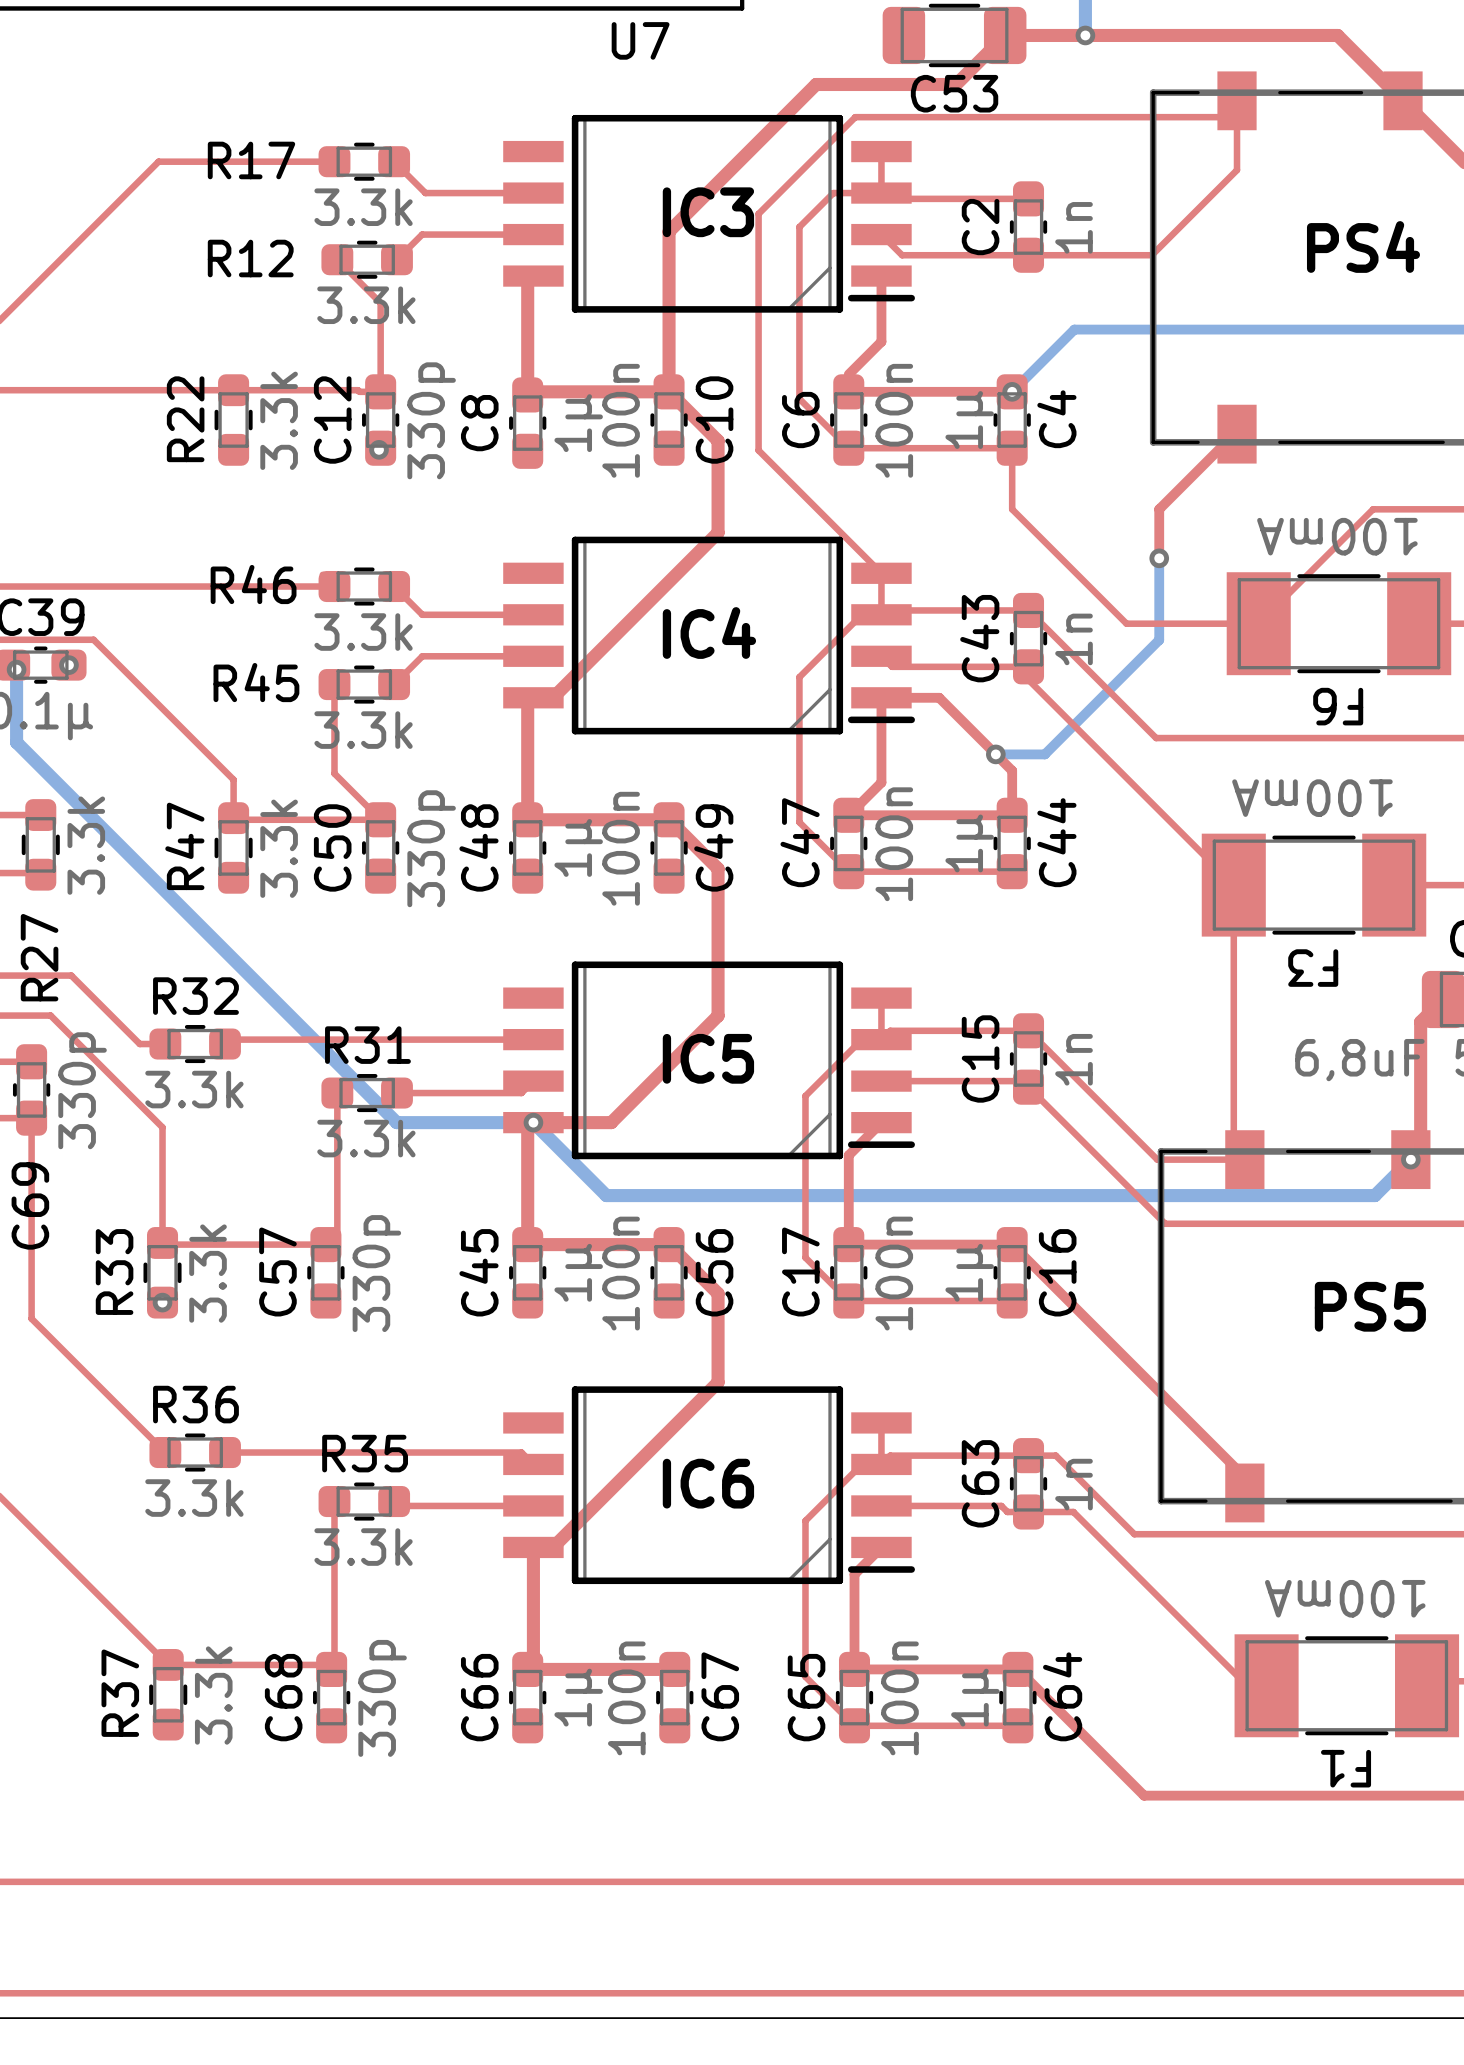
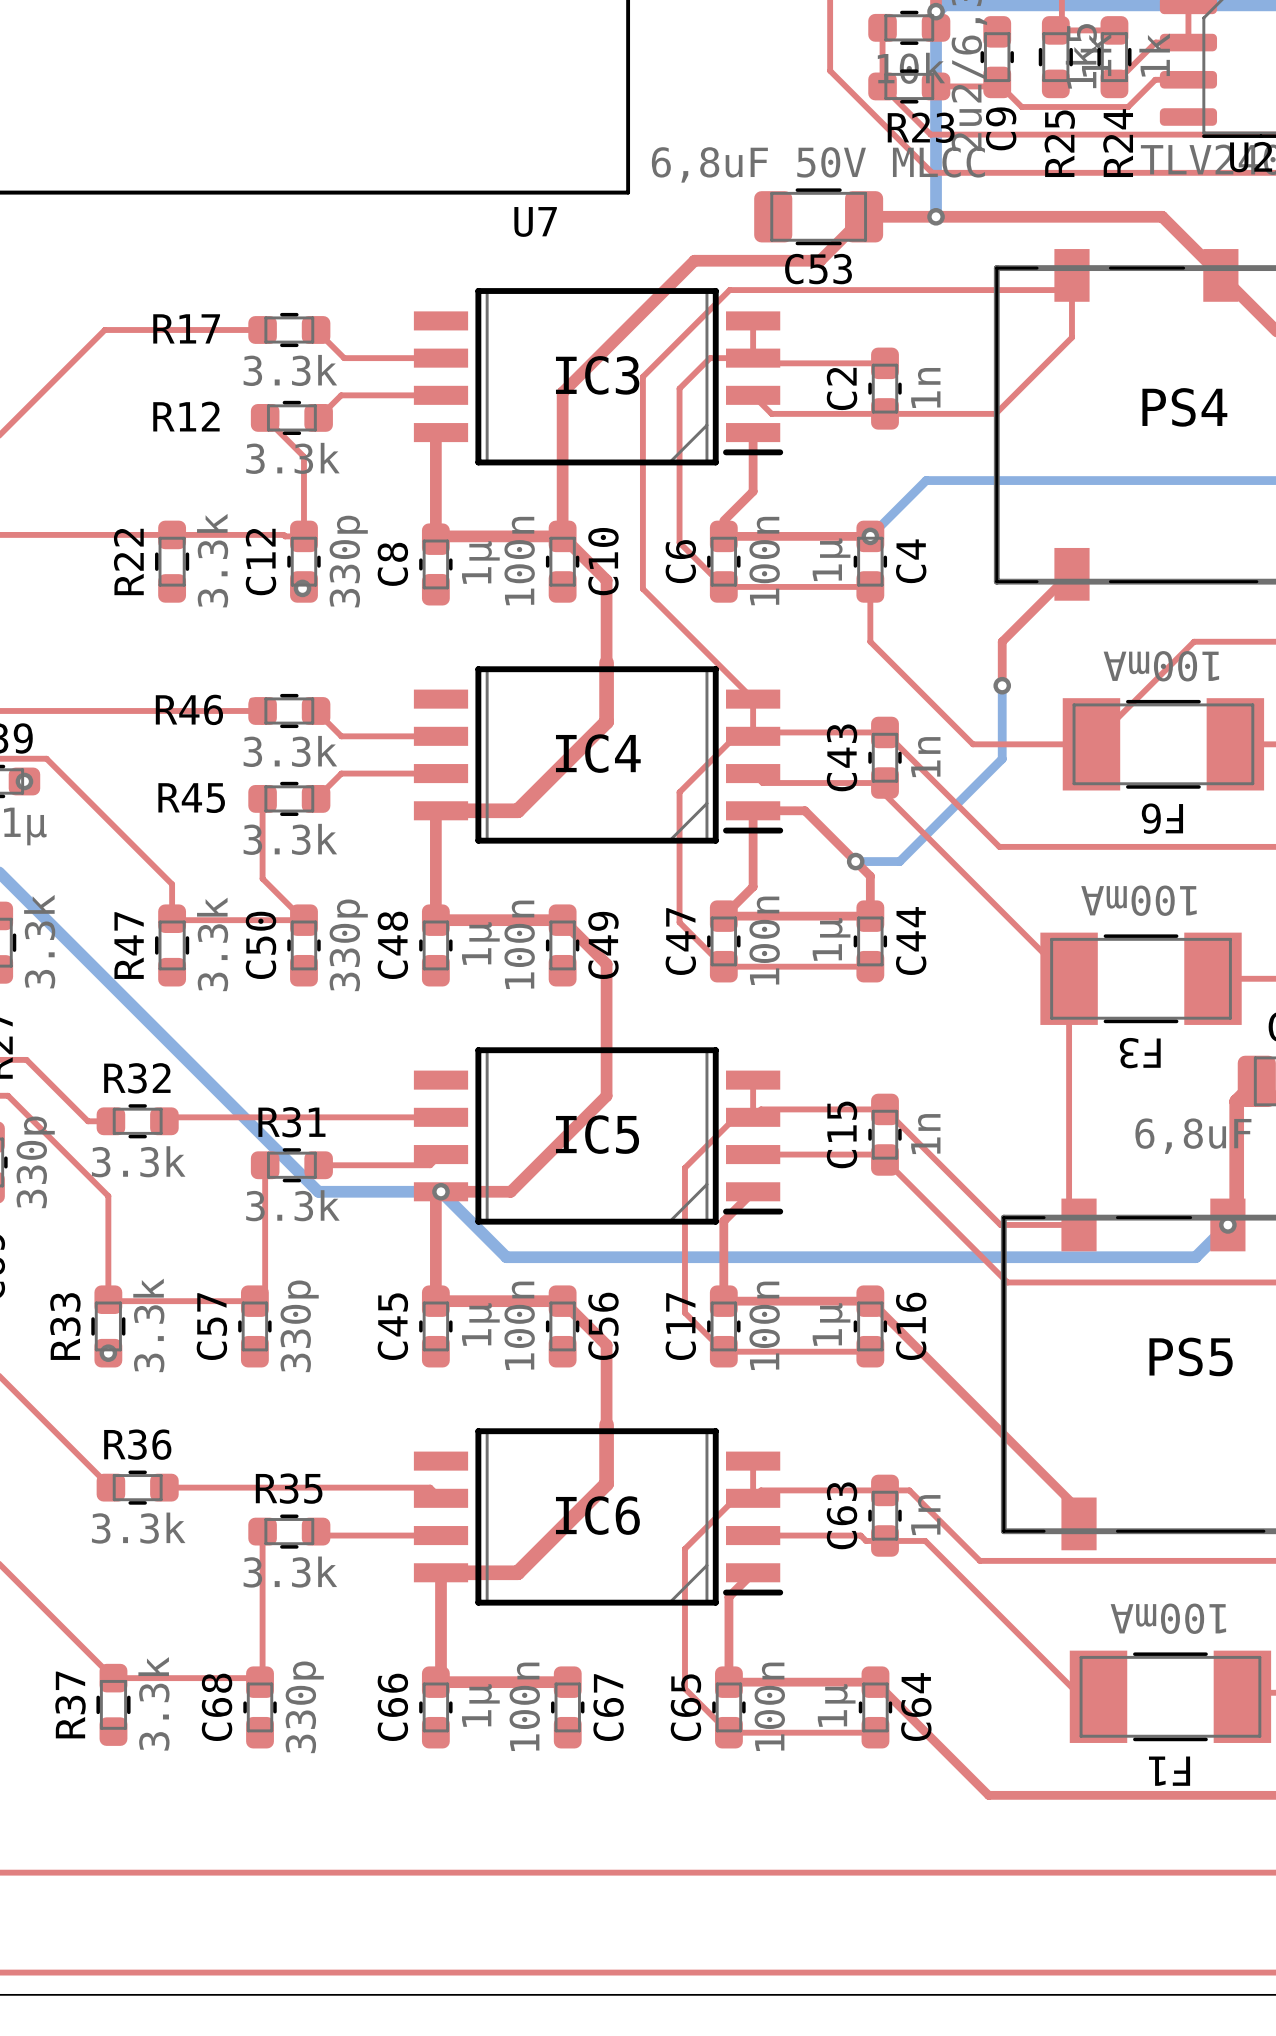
top track: (718, 532) (553, 697) -> (606, 662) (606, 721) (517, 810) (458, 810)
top track width: thin (1443, 999) (1420, 1021) (1420, 1149) (1410, 1159) -> thick (1256, 1081) (1236, 1101) (1236, 1216) (1227, 1224)
top track: (718, 1382) (553, 1547) -> (606, 1424) (606, 1483) (517, 1572) (458, 1572)

